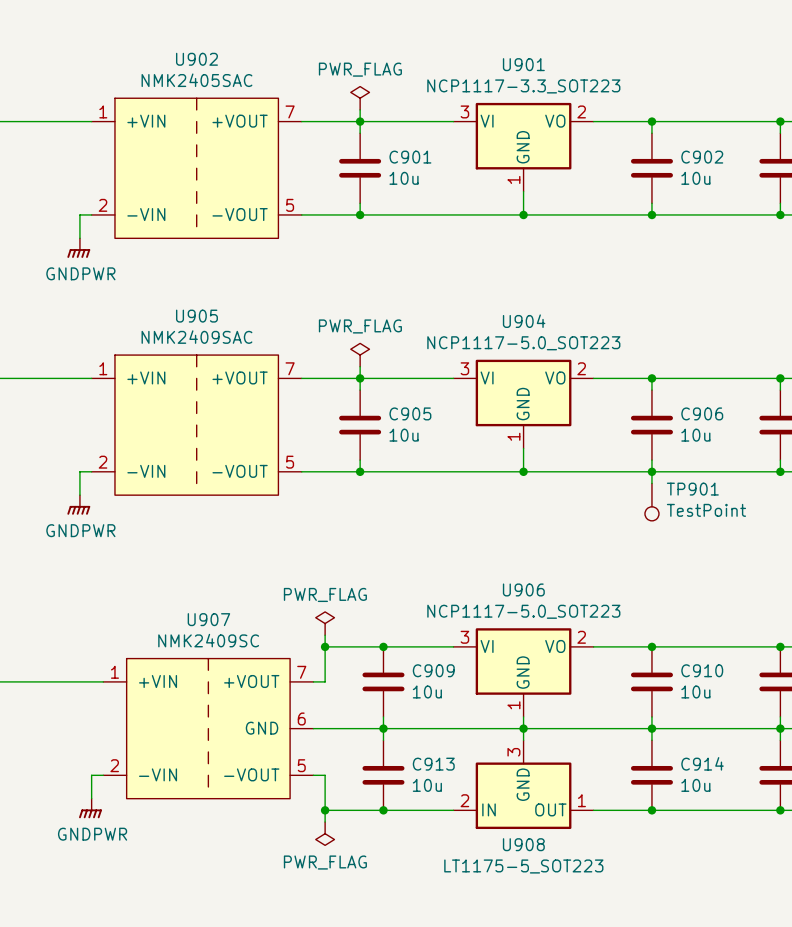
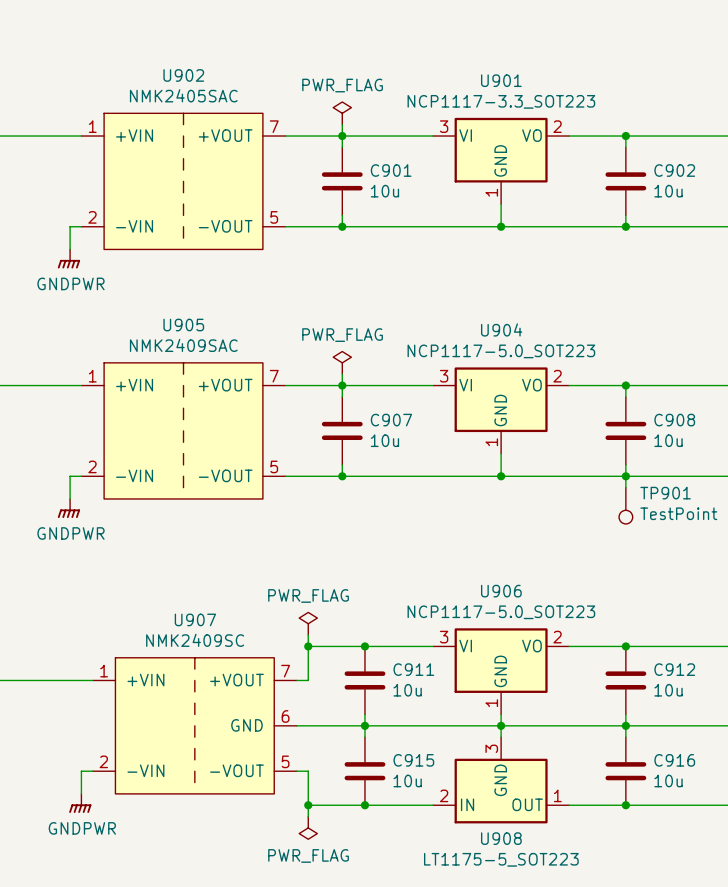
C905 name: C905 (410, 413) -> C907 (391, 420)
C906 name: C906 (702, 413) -> C908 (674, 420)
C909 name: C909 (433, 670) -> C911 (413, 669)
C910 name: C910 (702, 670) -> C912 (674, 669)
C914 name: C914 (702, 763) -> C916 (674, 760)
C913 name: C913 (433, 764) -> C915 (413, 760)

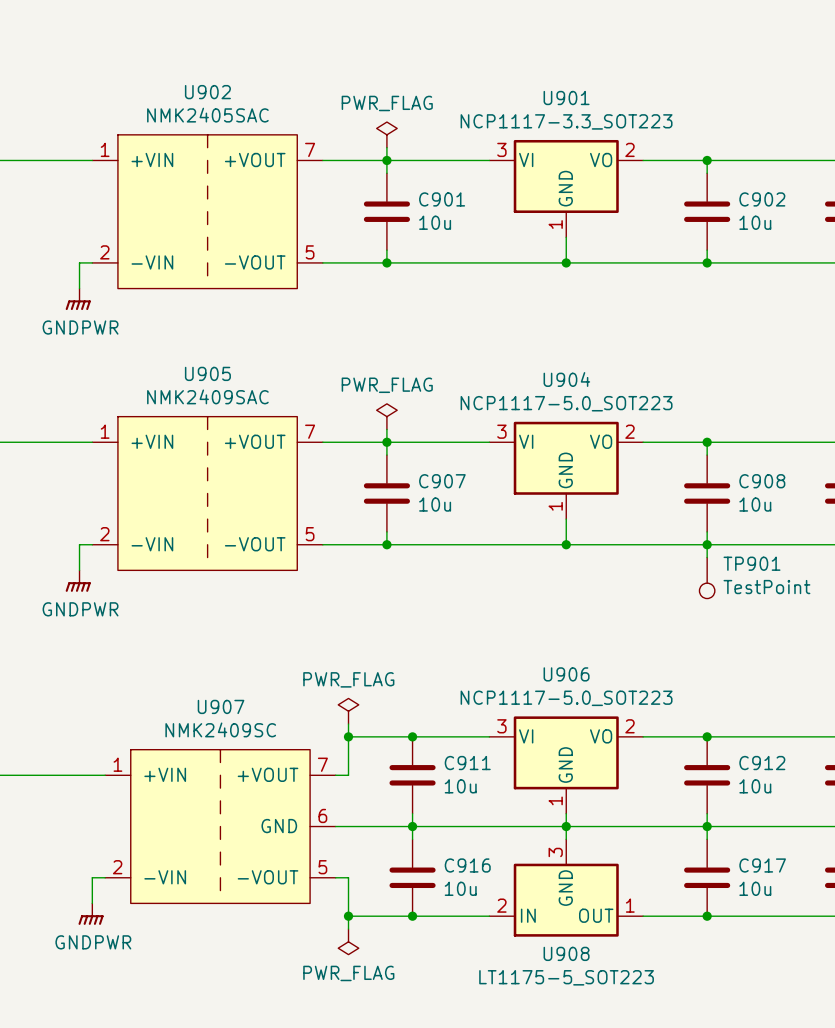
C915 name: C915 (413, 760) -> C916 (467, 865)
C916 name: C916 (674, 760) -> C917 (762, 865)

